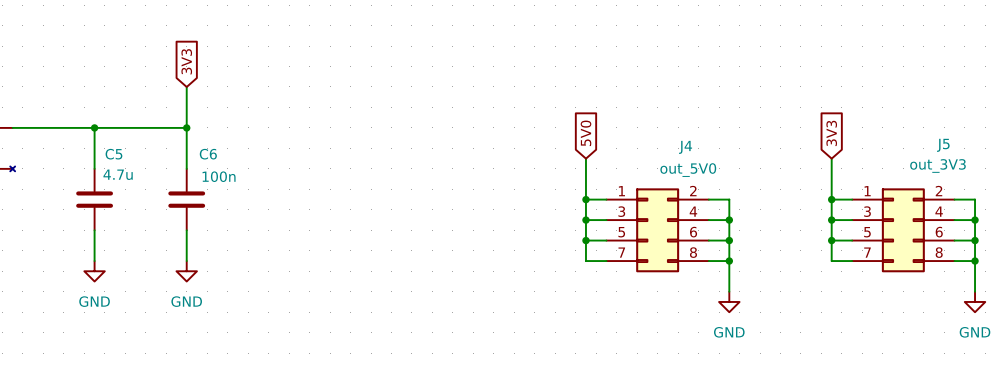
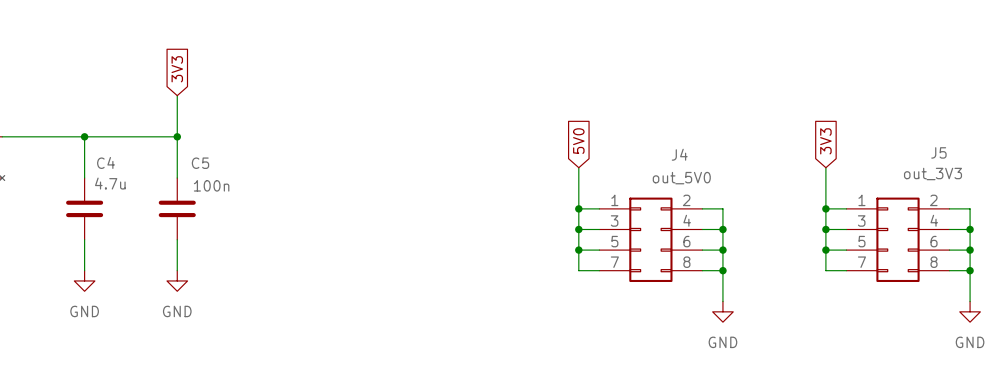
C5 name: C5 (113, 154) -> C4 (106, 162)
C6 name: C6 (208, 154) -> C5 (200, 163)

